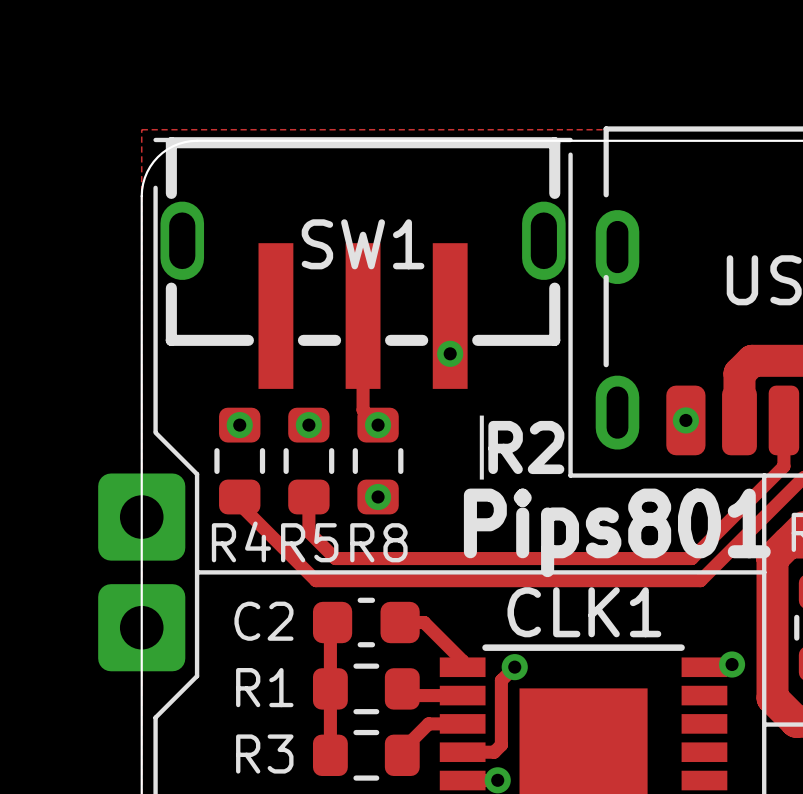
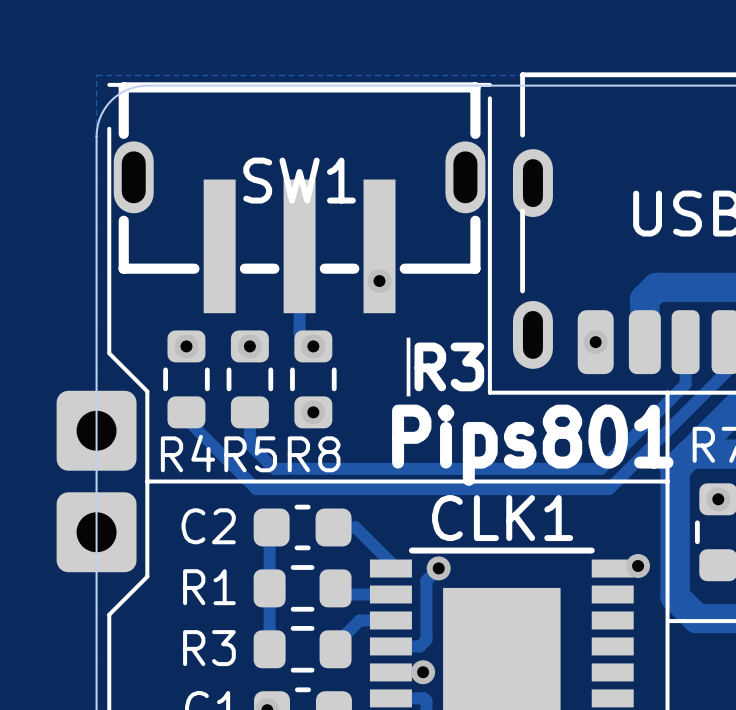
text: R2 (526, 447) -> R3 (449, 366)

